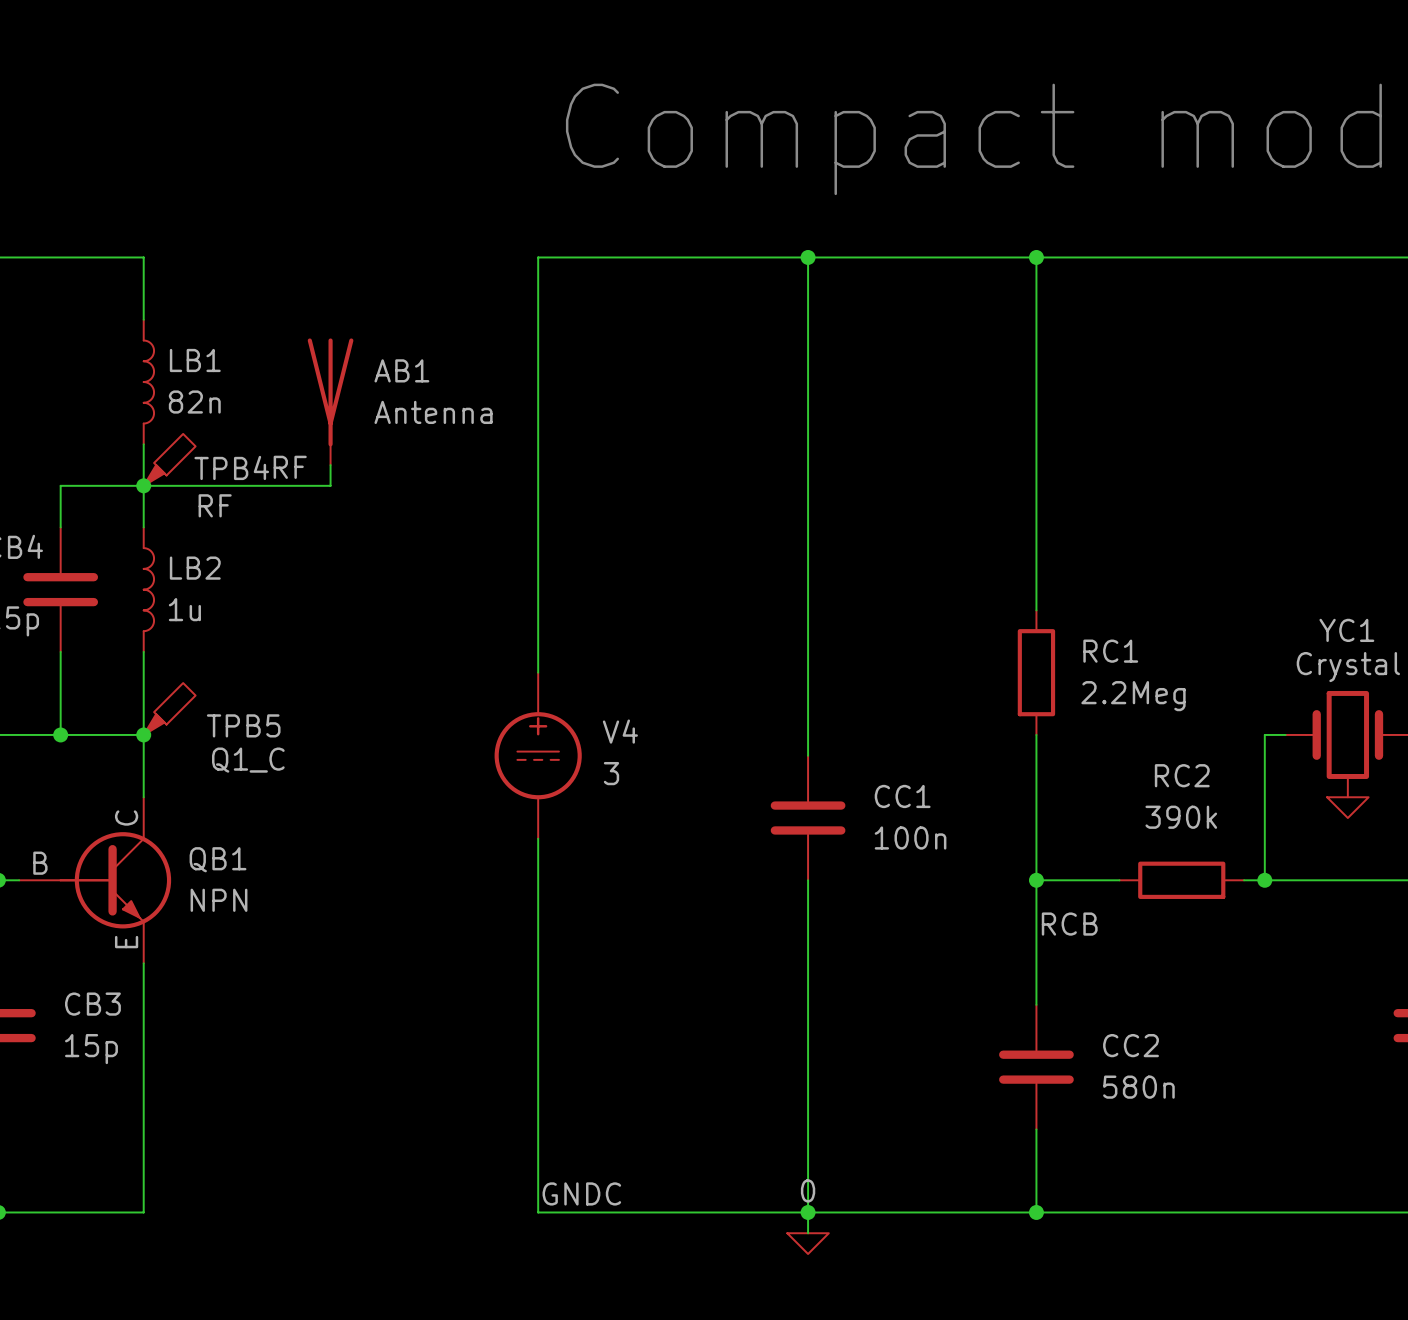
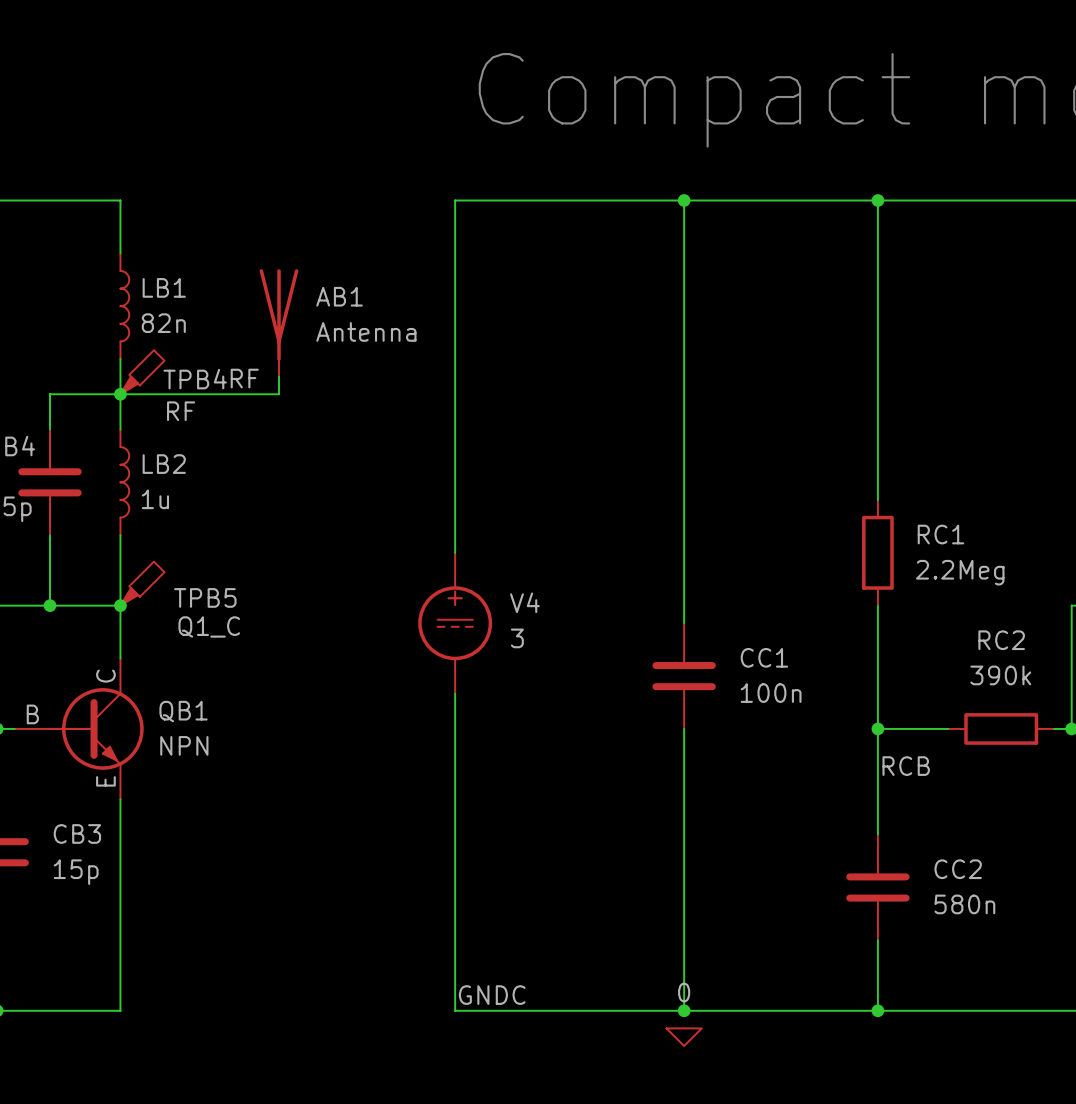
wire: (808, 1212) (808, 1233) -> none

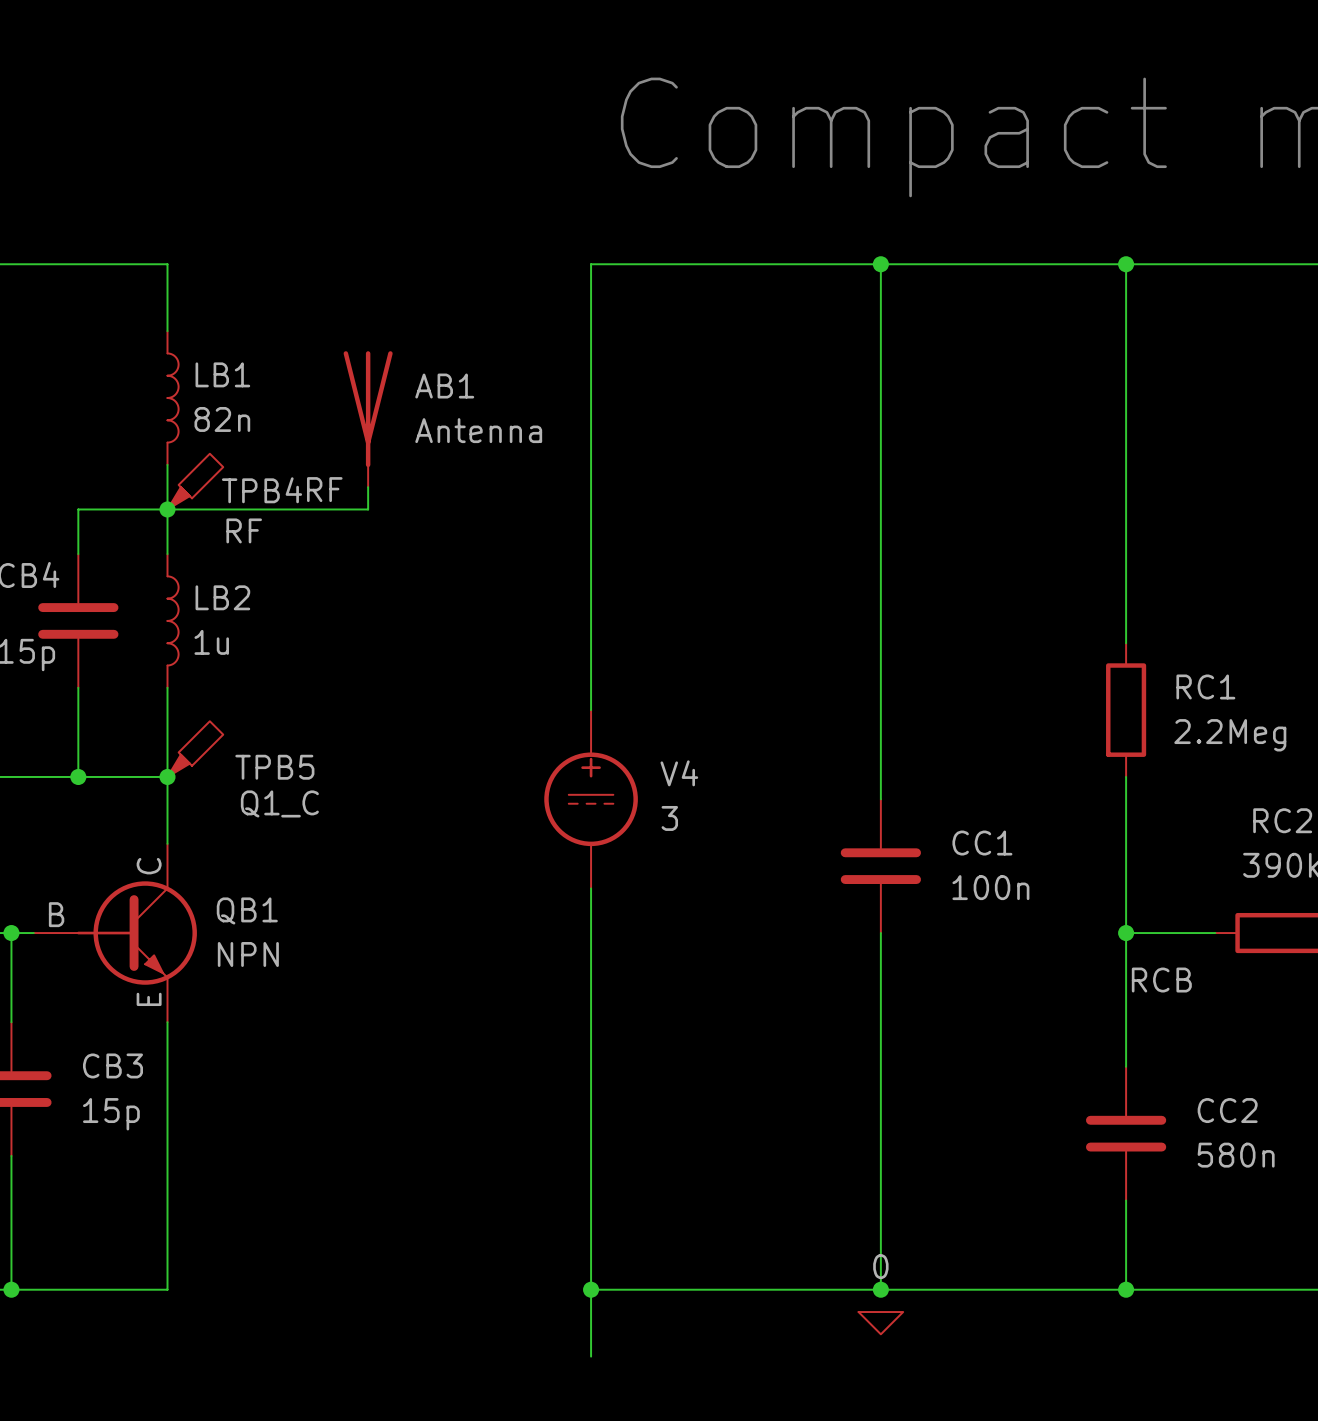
label: GNDC (492, 995) -> none
wire: none -> (591, 1289) (591, 1356)
junction: none -> (591, 1289)

